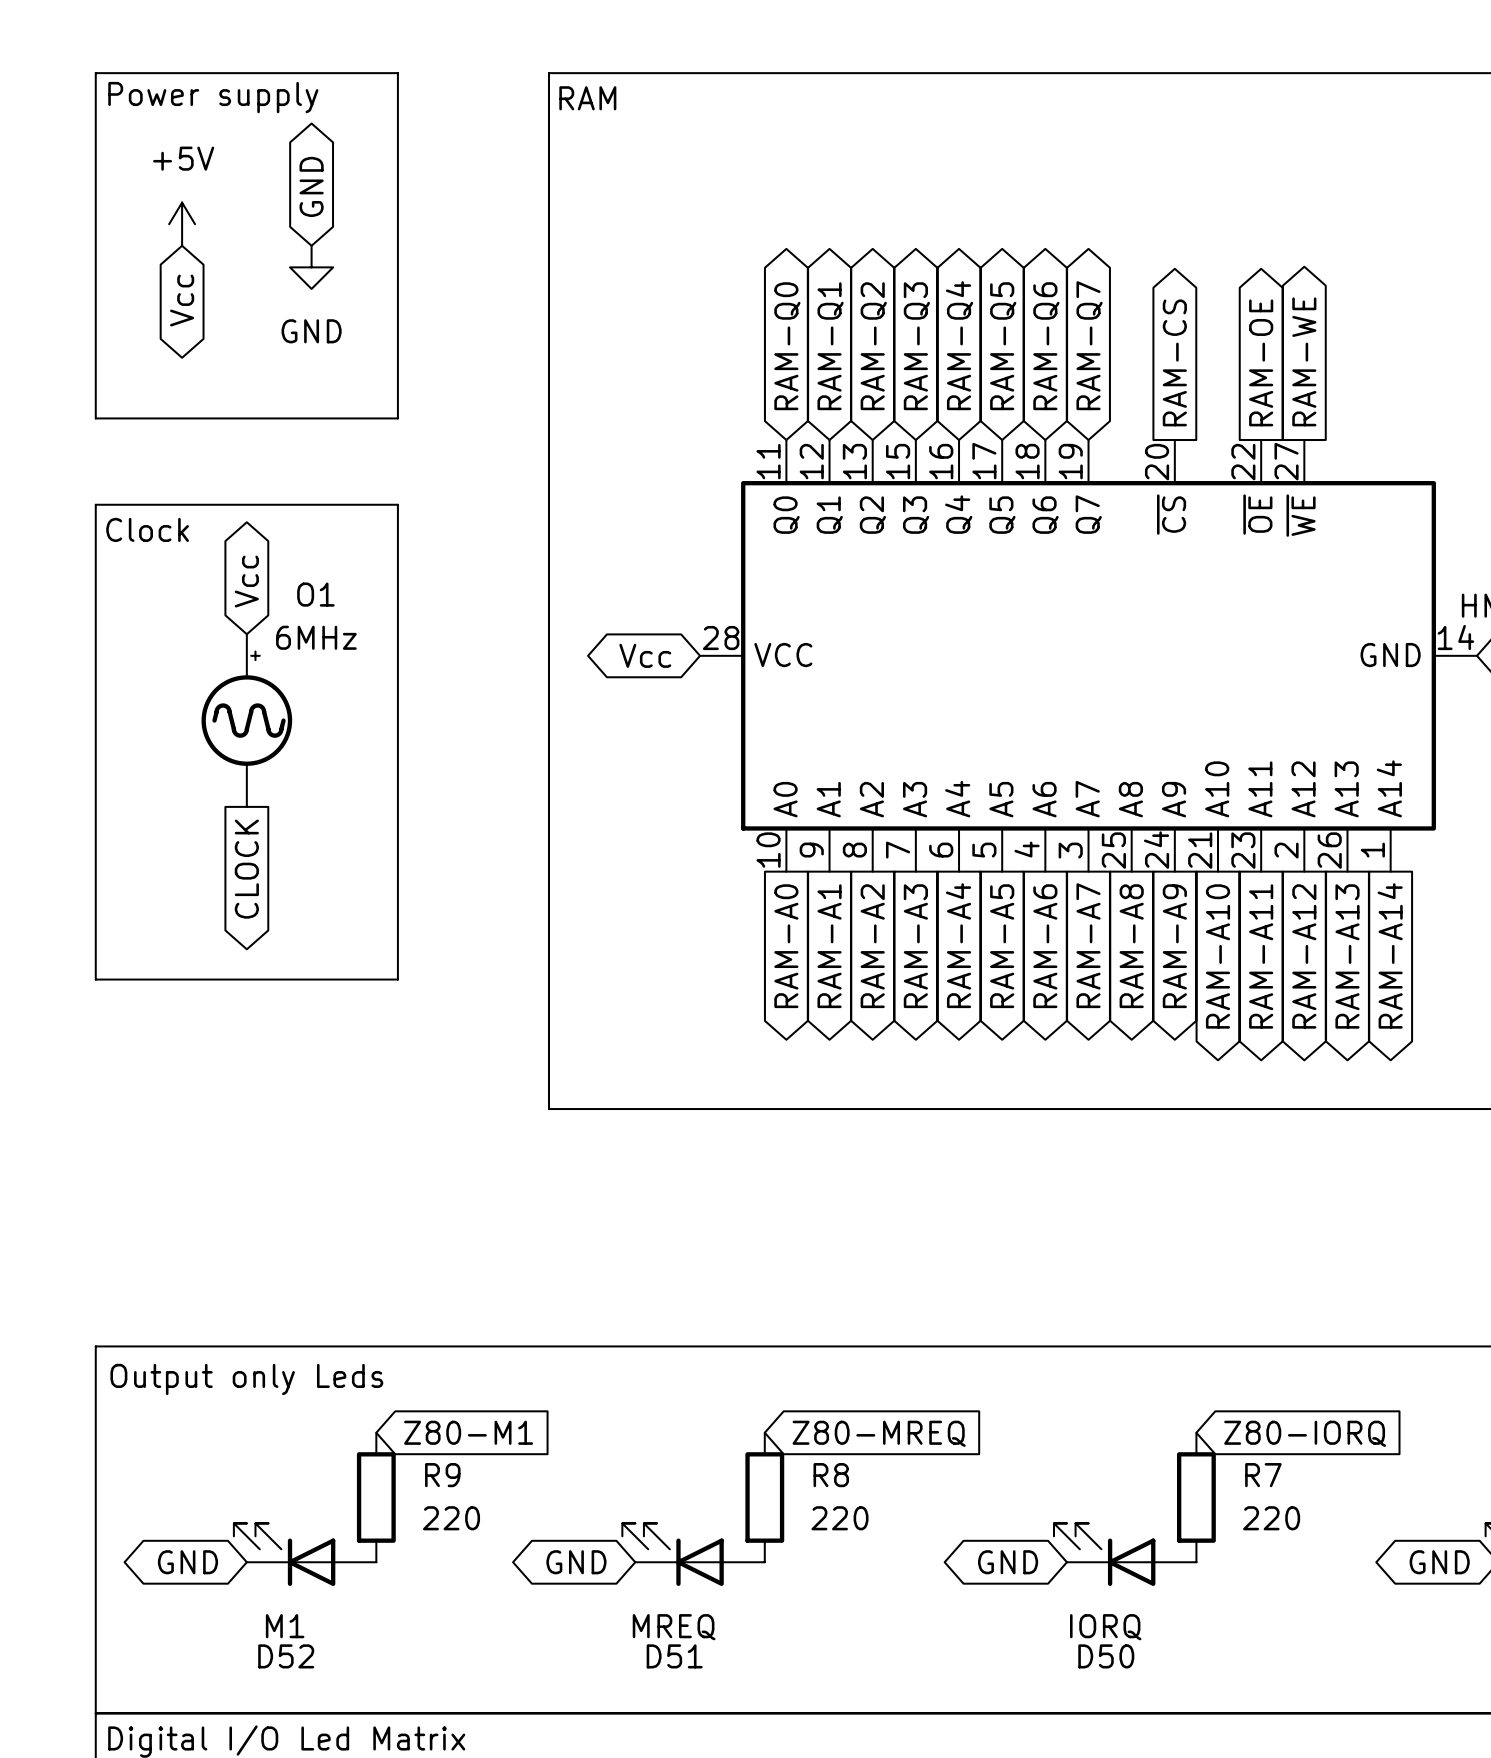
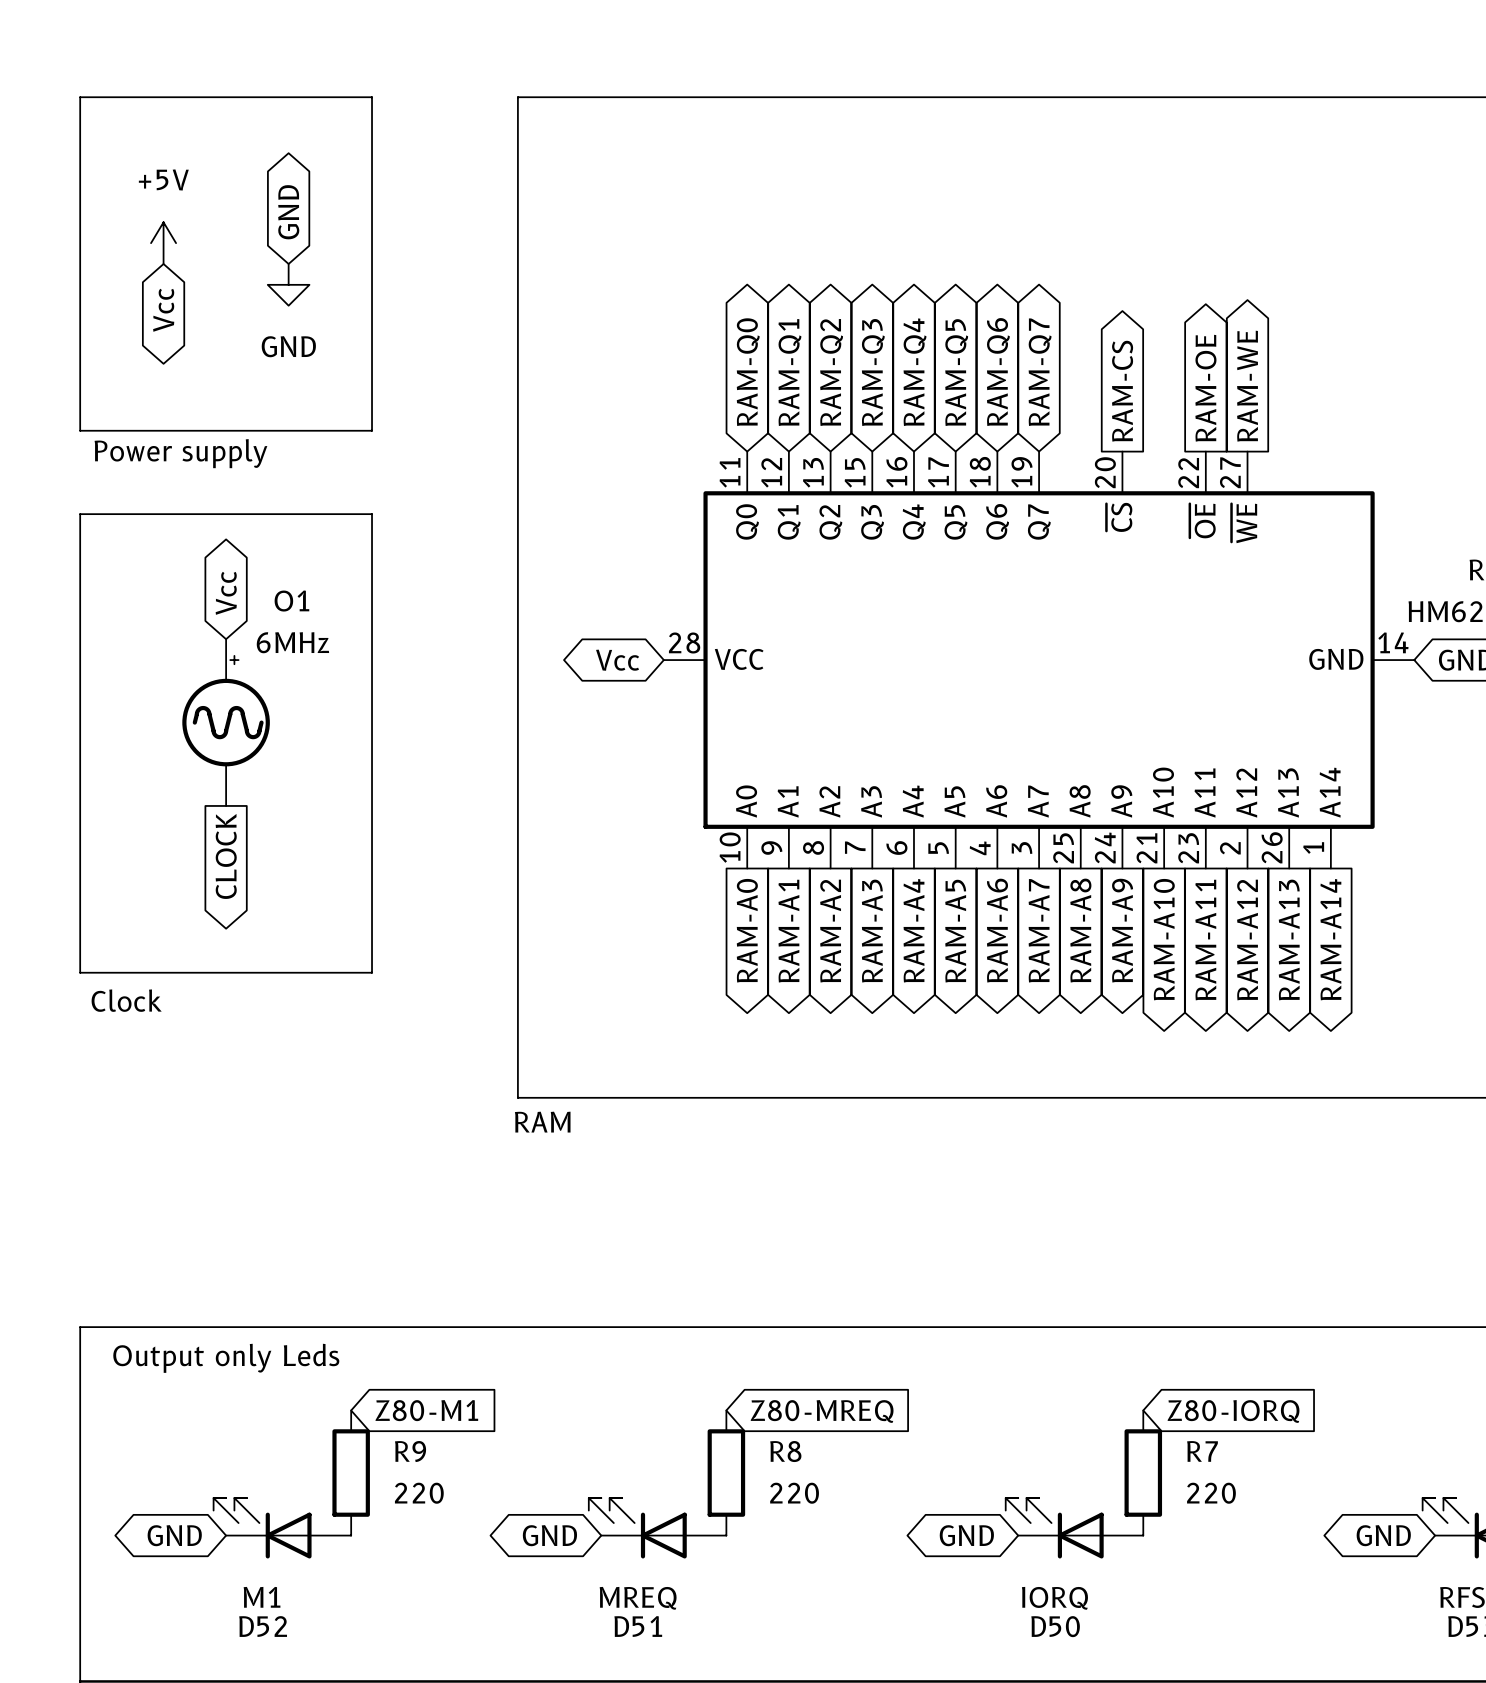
text position: Power supply (213, 97) -> Power supply (180, 453)
text: RAM (587, 98) -> none
text: Clock (147, 529) -> none
text: none -> Clock (126, 1000)
text: none -> RAM (542, 1122)

